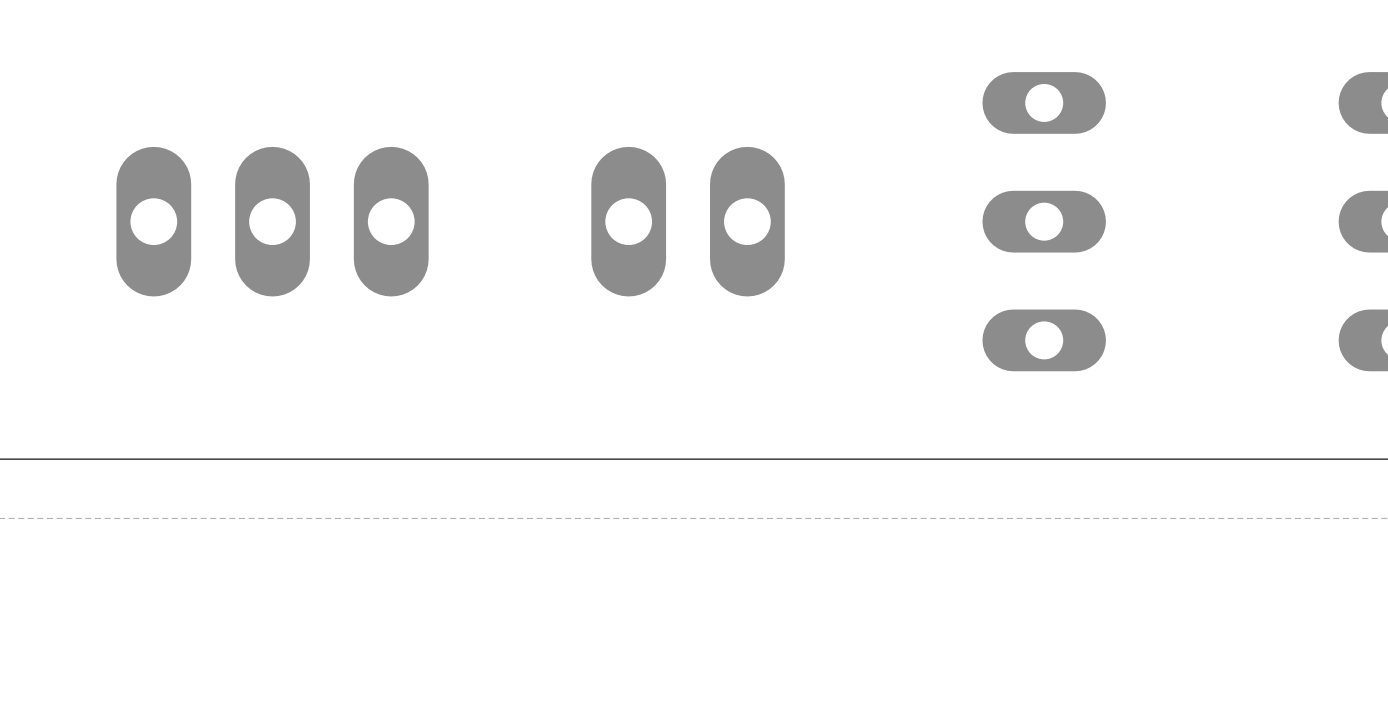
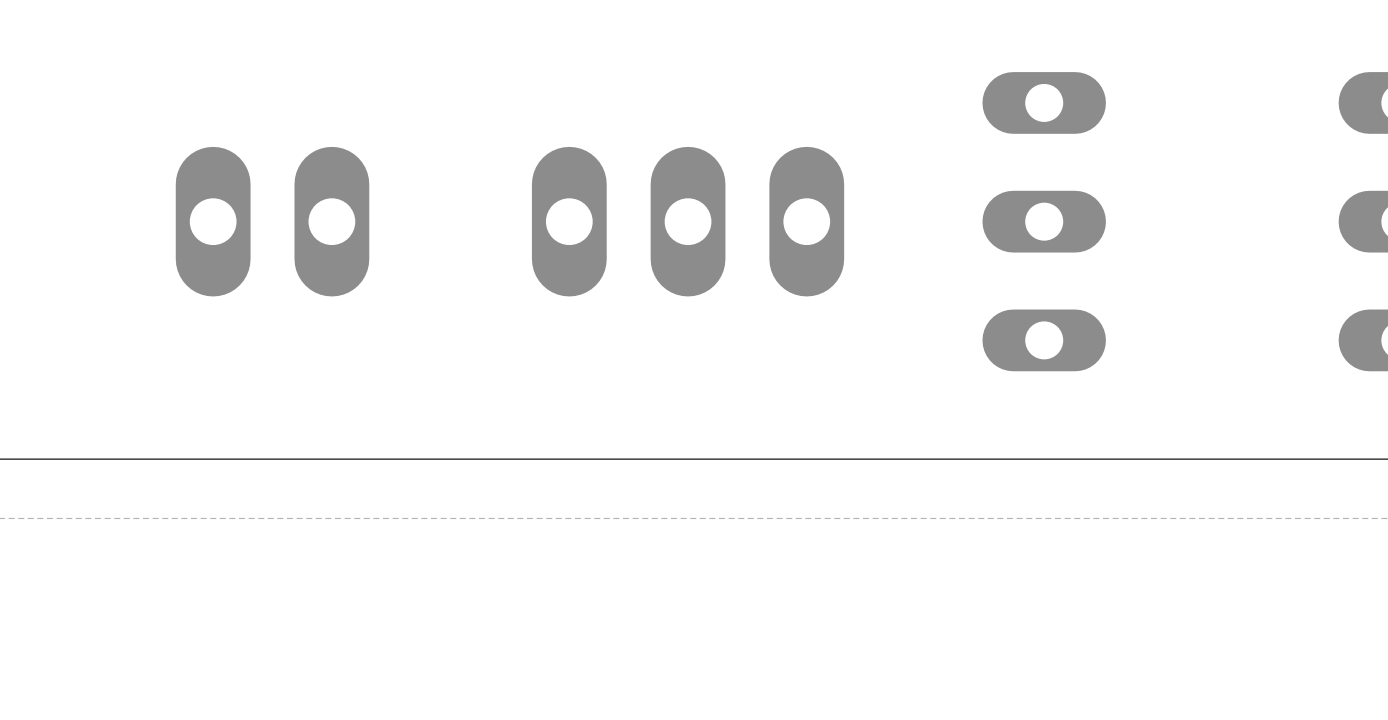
part footprint: [116, 146, 429, 297] -> [175, 146, 370, 297]
part footprint: [591, 146, 785, 297] -> [531, 146, 845, 297]

